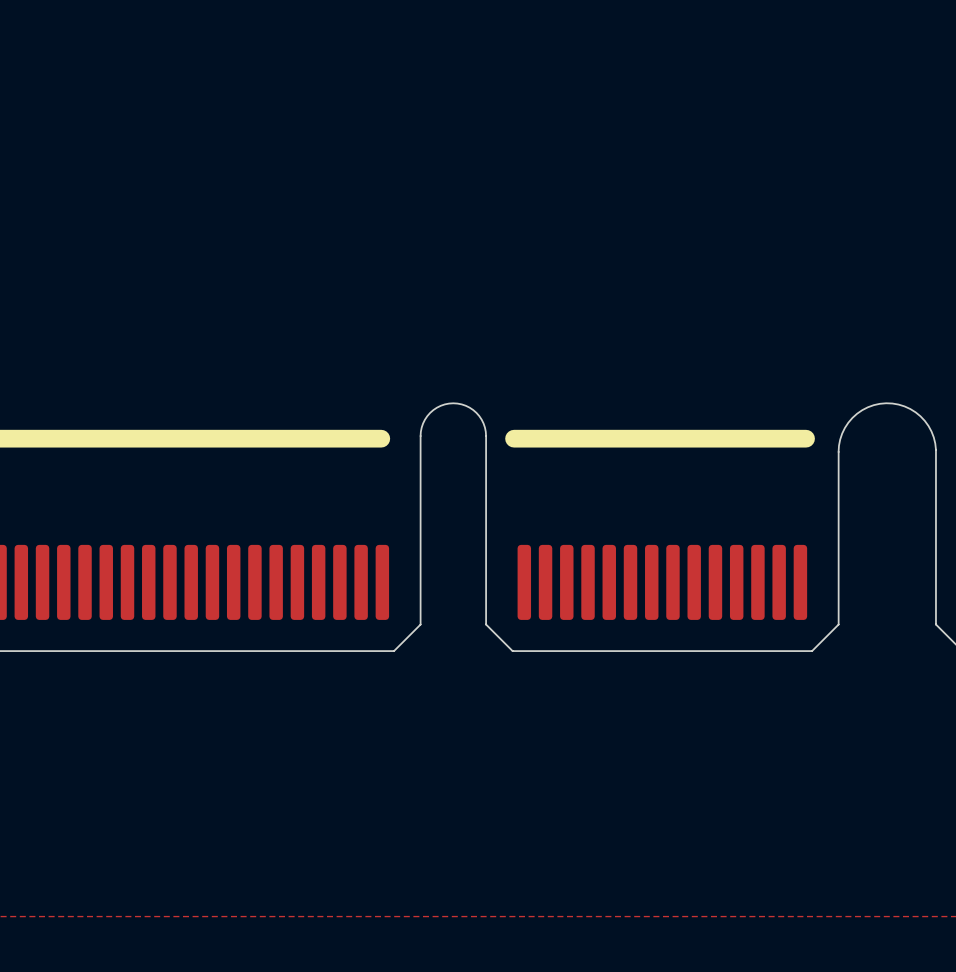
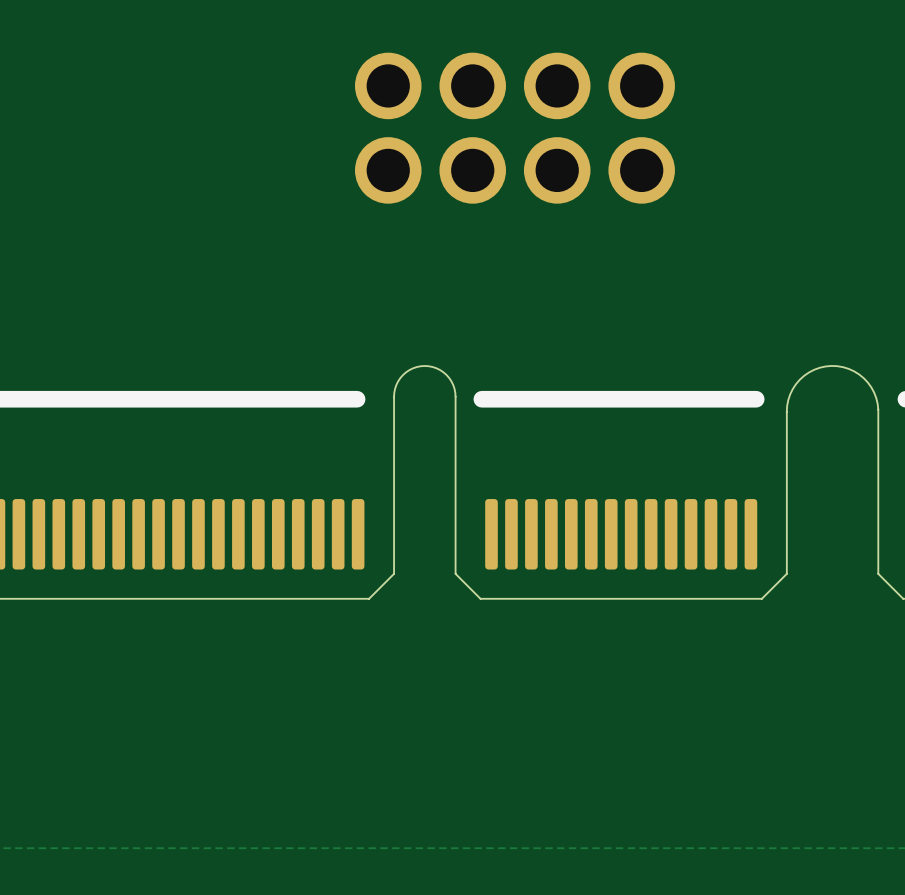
part: none -> (388, 85)
part: none -> (472, 85)
part: none -> (557, 85)
part: none -> (641, 85)
part: none -> (388, 170)
part: none -> (472, 170)
part: none -> (557, 170)
part: none -> (641, 170)

